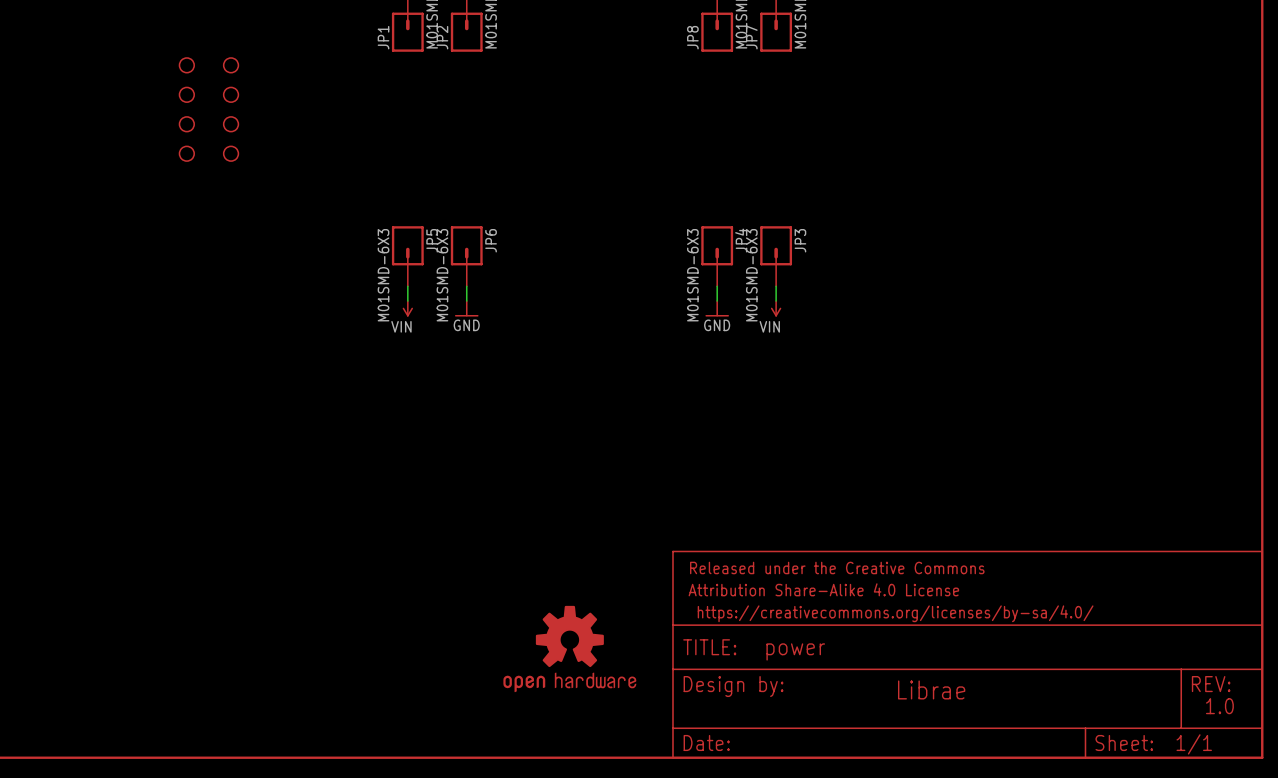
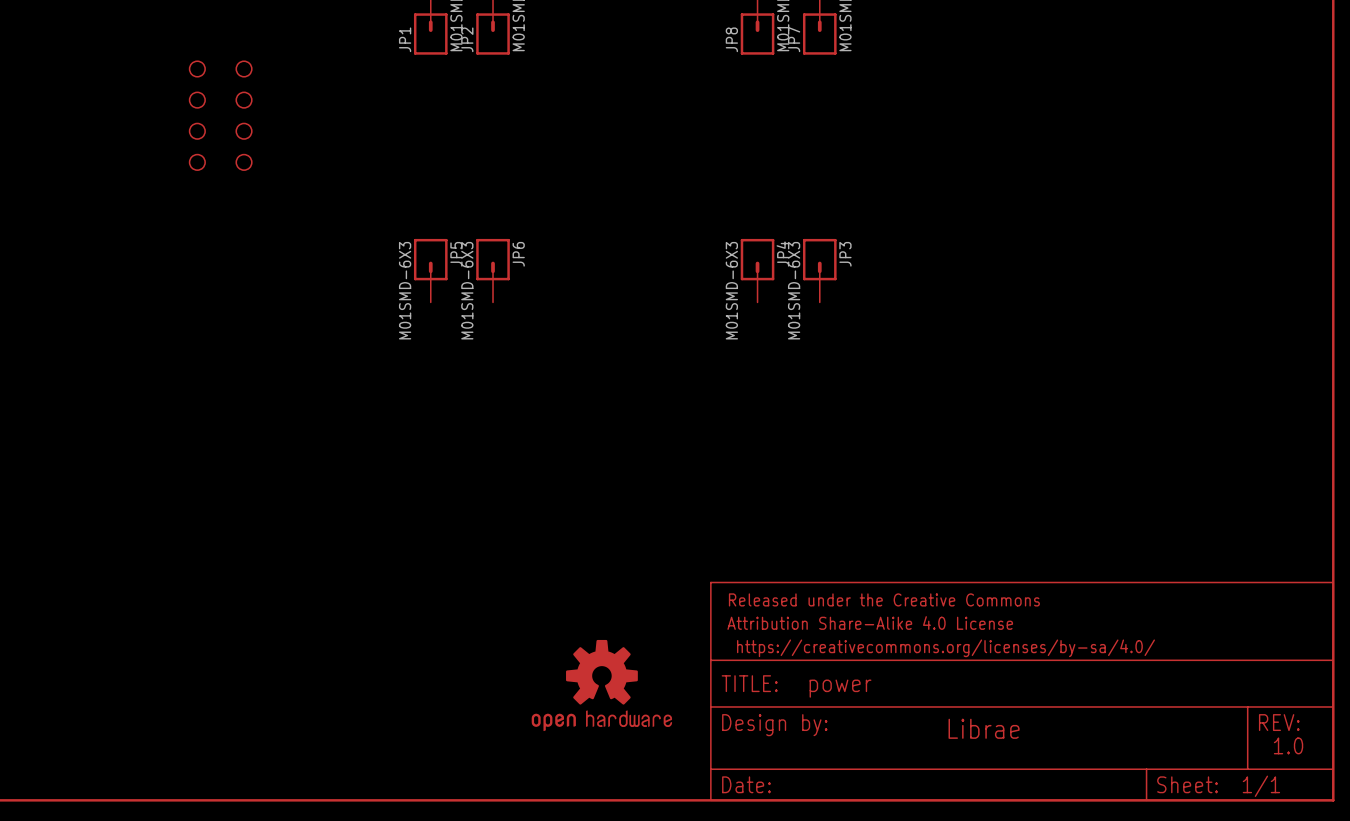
wire: (407, 286) (407, 301) -> none
wire: (466, 286) (466, 301) -> none
wire: (717, 286) (717, 301) -> none
wire: (776, 286) (776, 301) -> none
power symbol: VIN (407, 308) -> none
power symbol: GND (466, 308) -> none
power symbol: GND (717, 308) -> none
power symbol: VIN (776, 308) -> none

